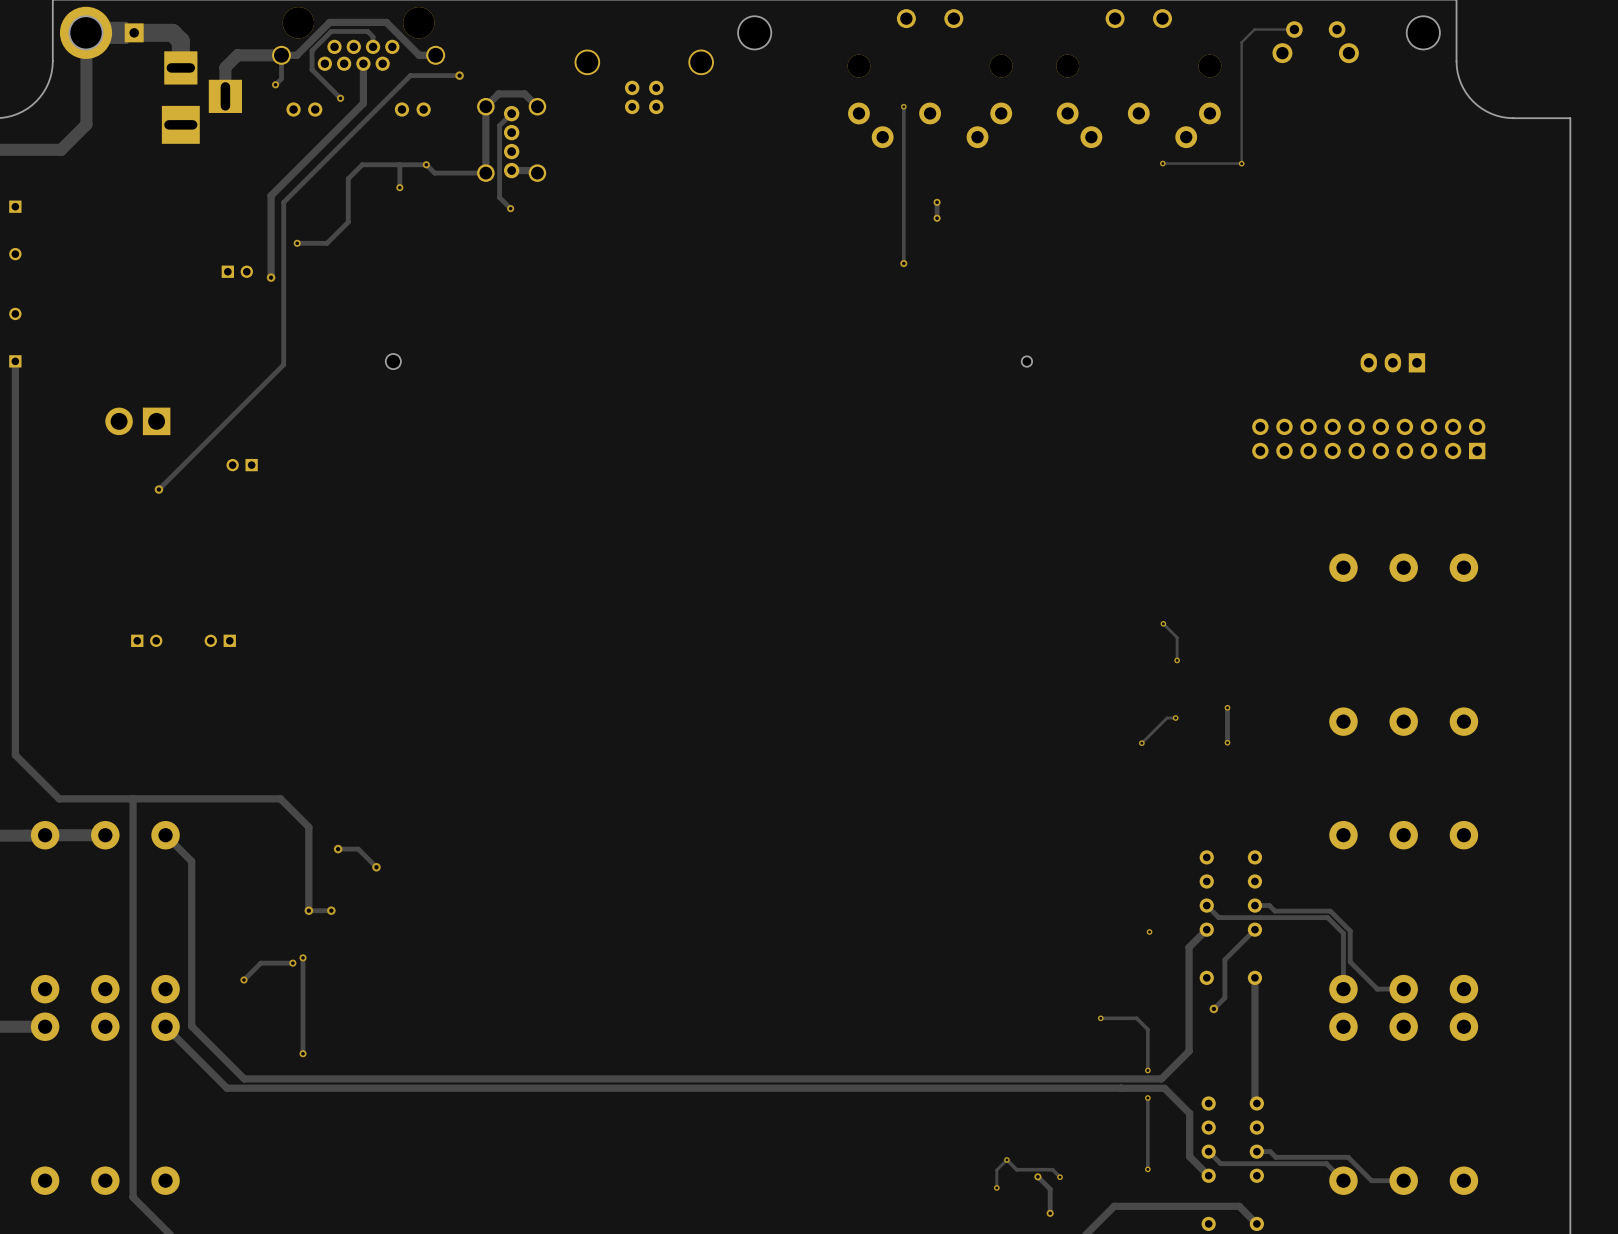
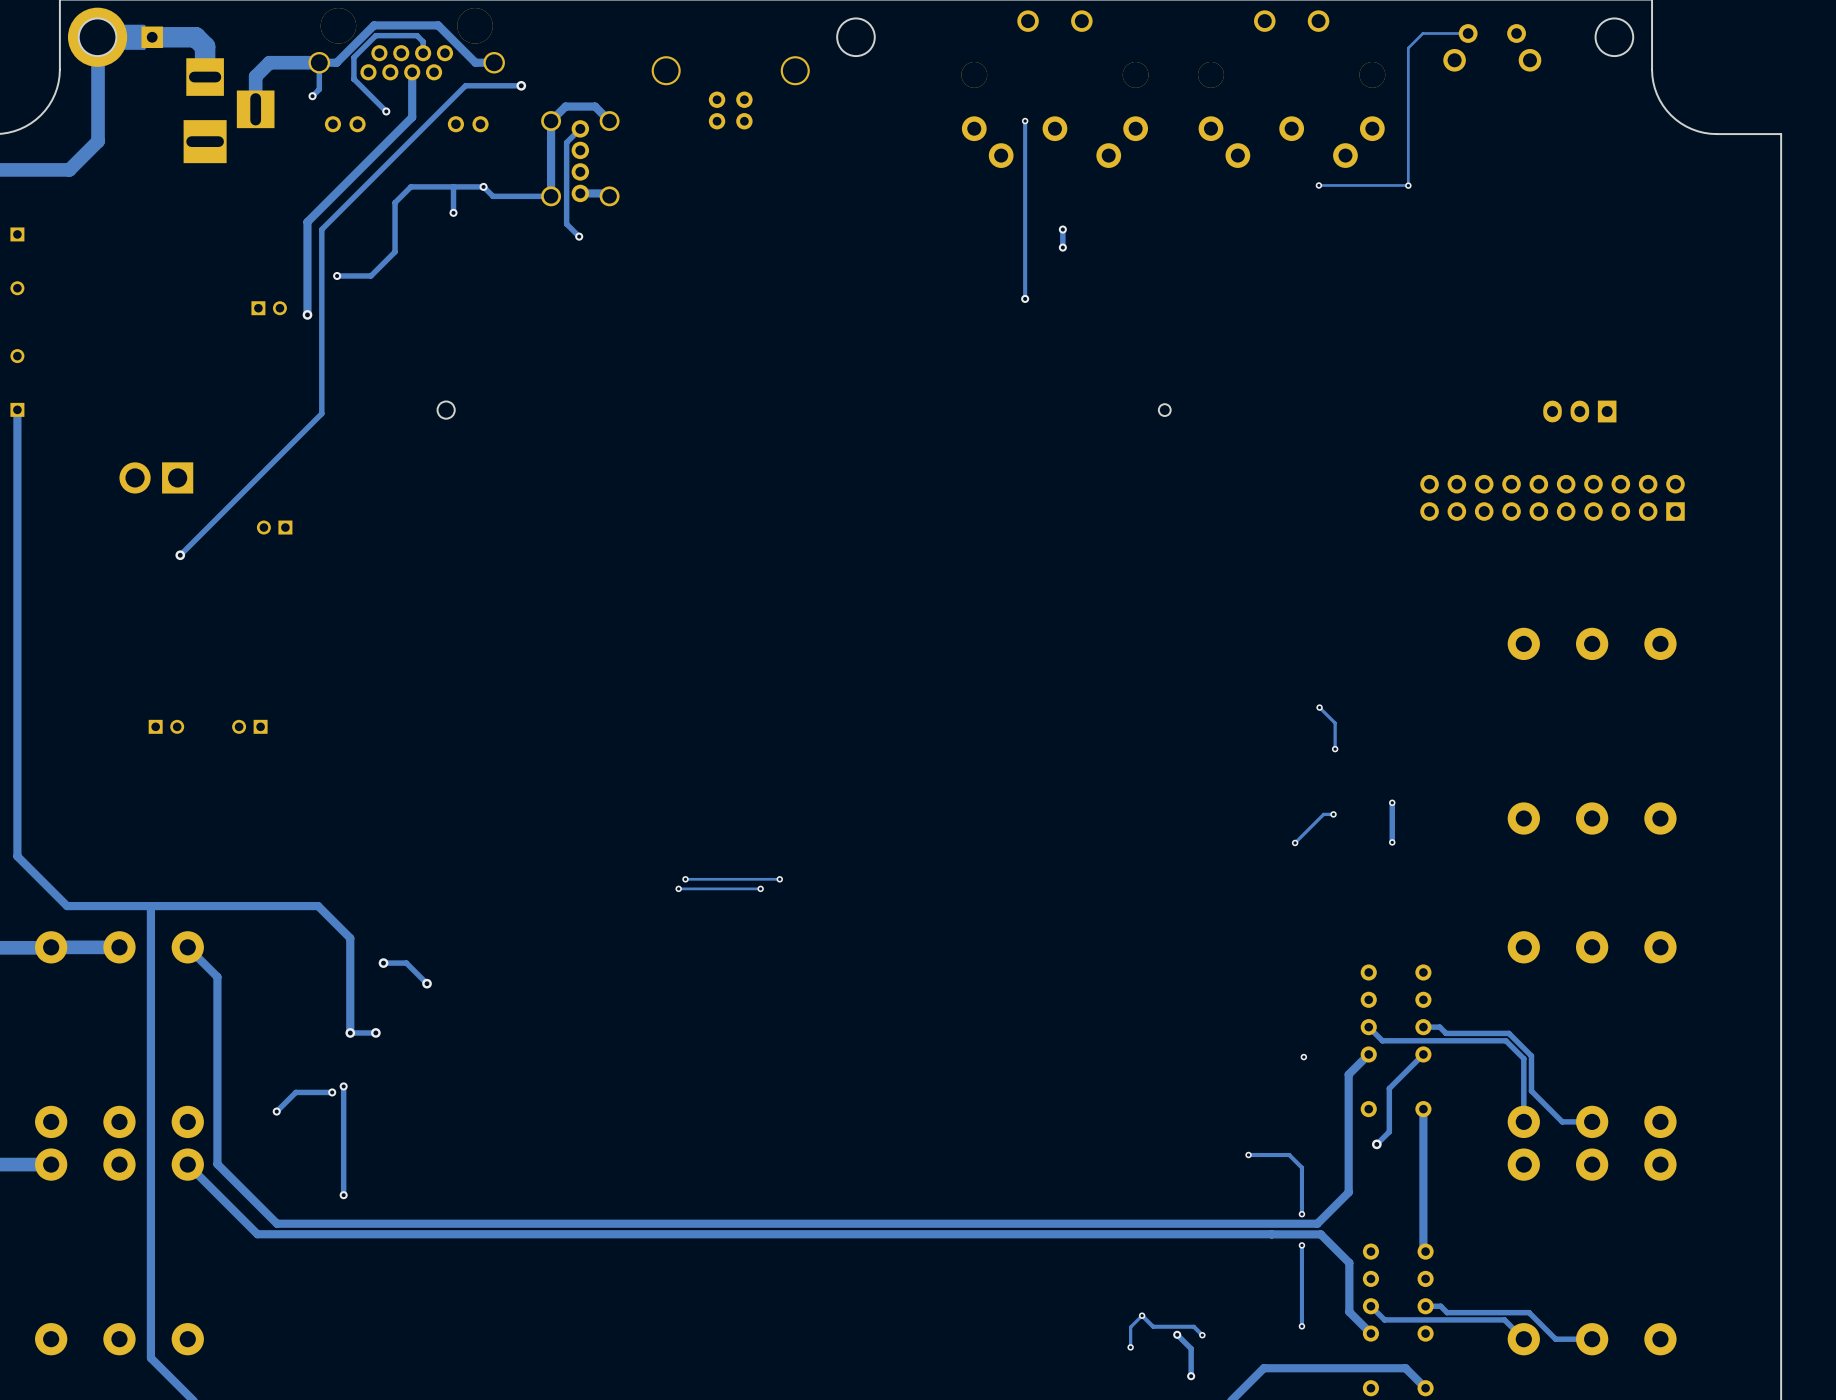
via: none -> (685, 879)
track: none -> (779, 879) (685, 879)
via: none -> (779, 879)
via: none -> (678, 888)
track: none -> (760, 888) (678, 888)
via: none -> (760, 888)

